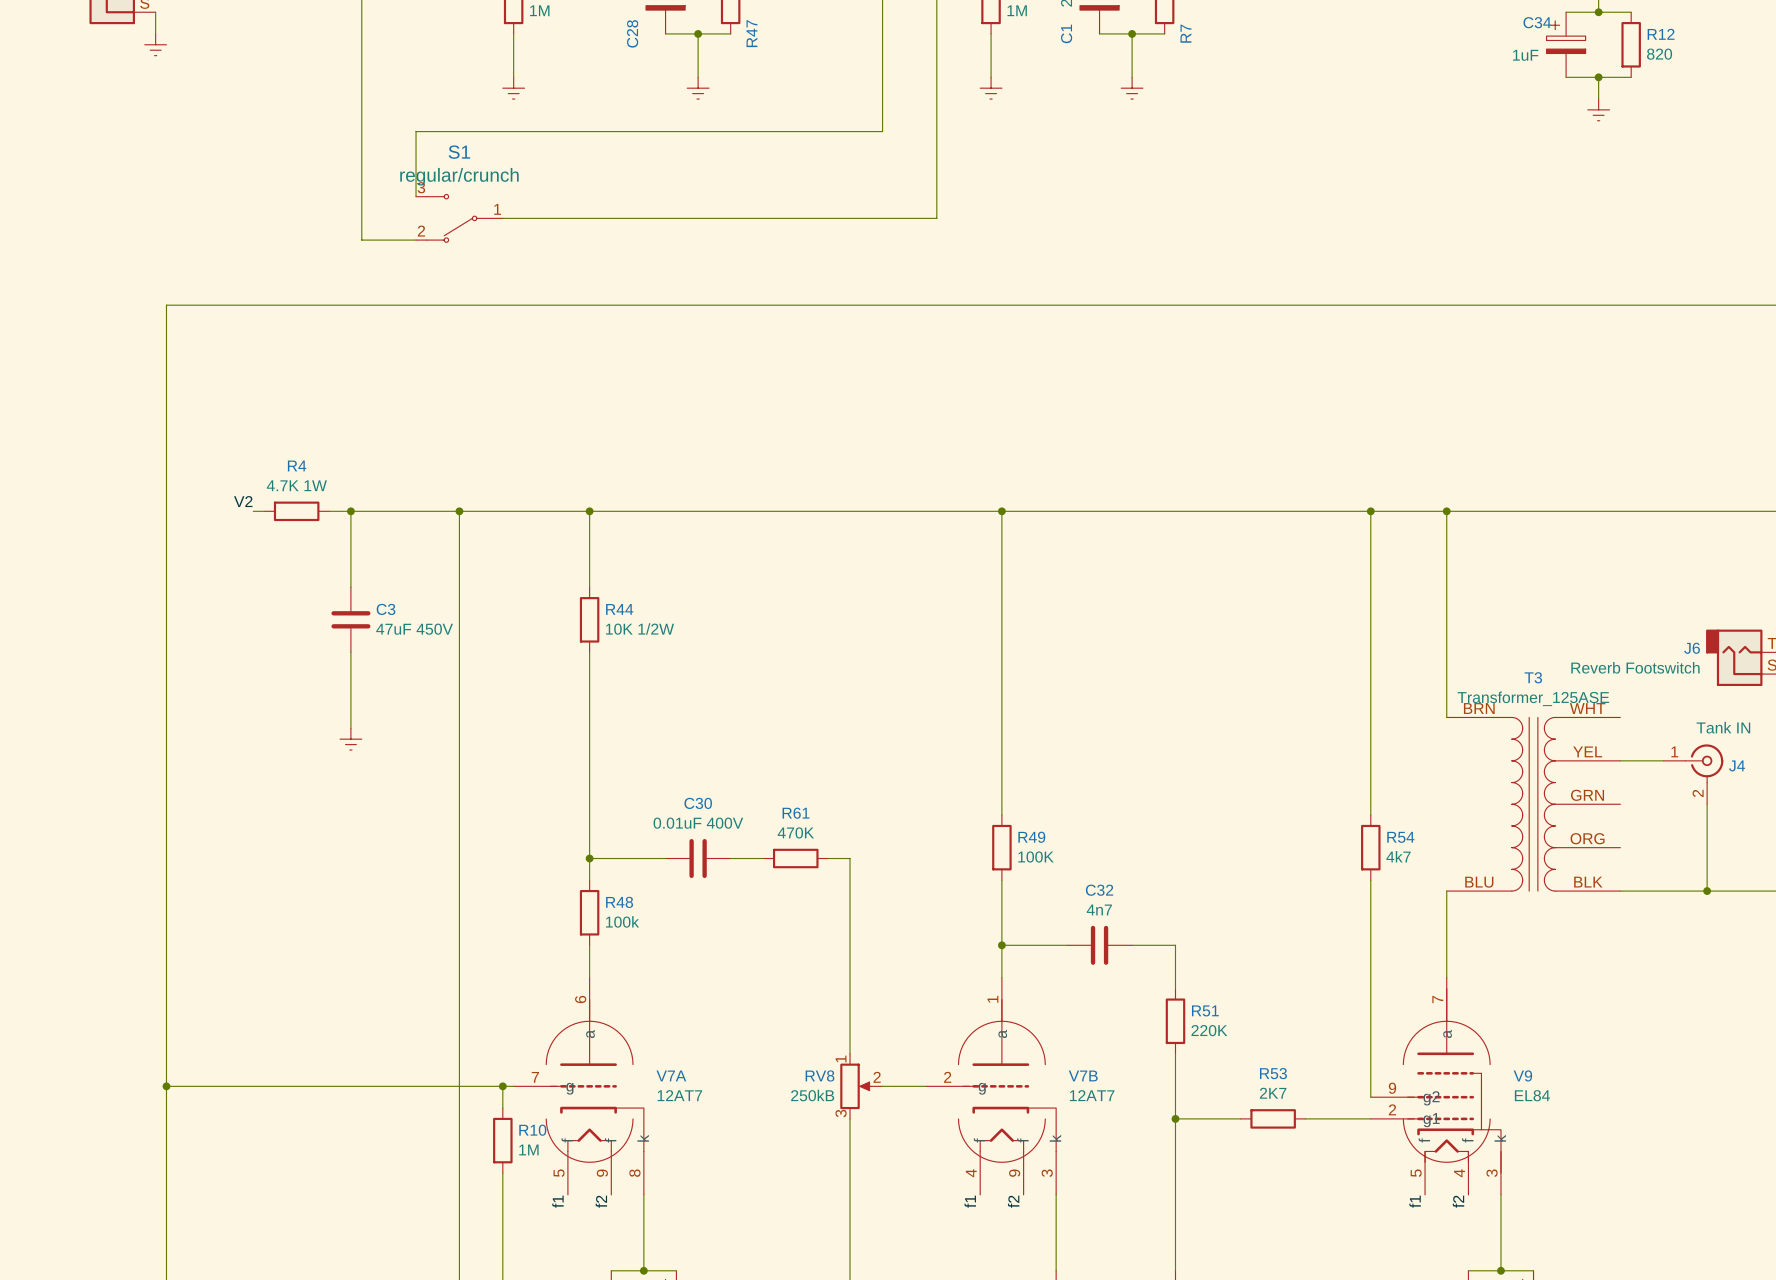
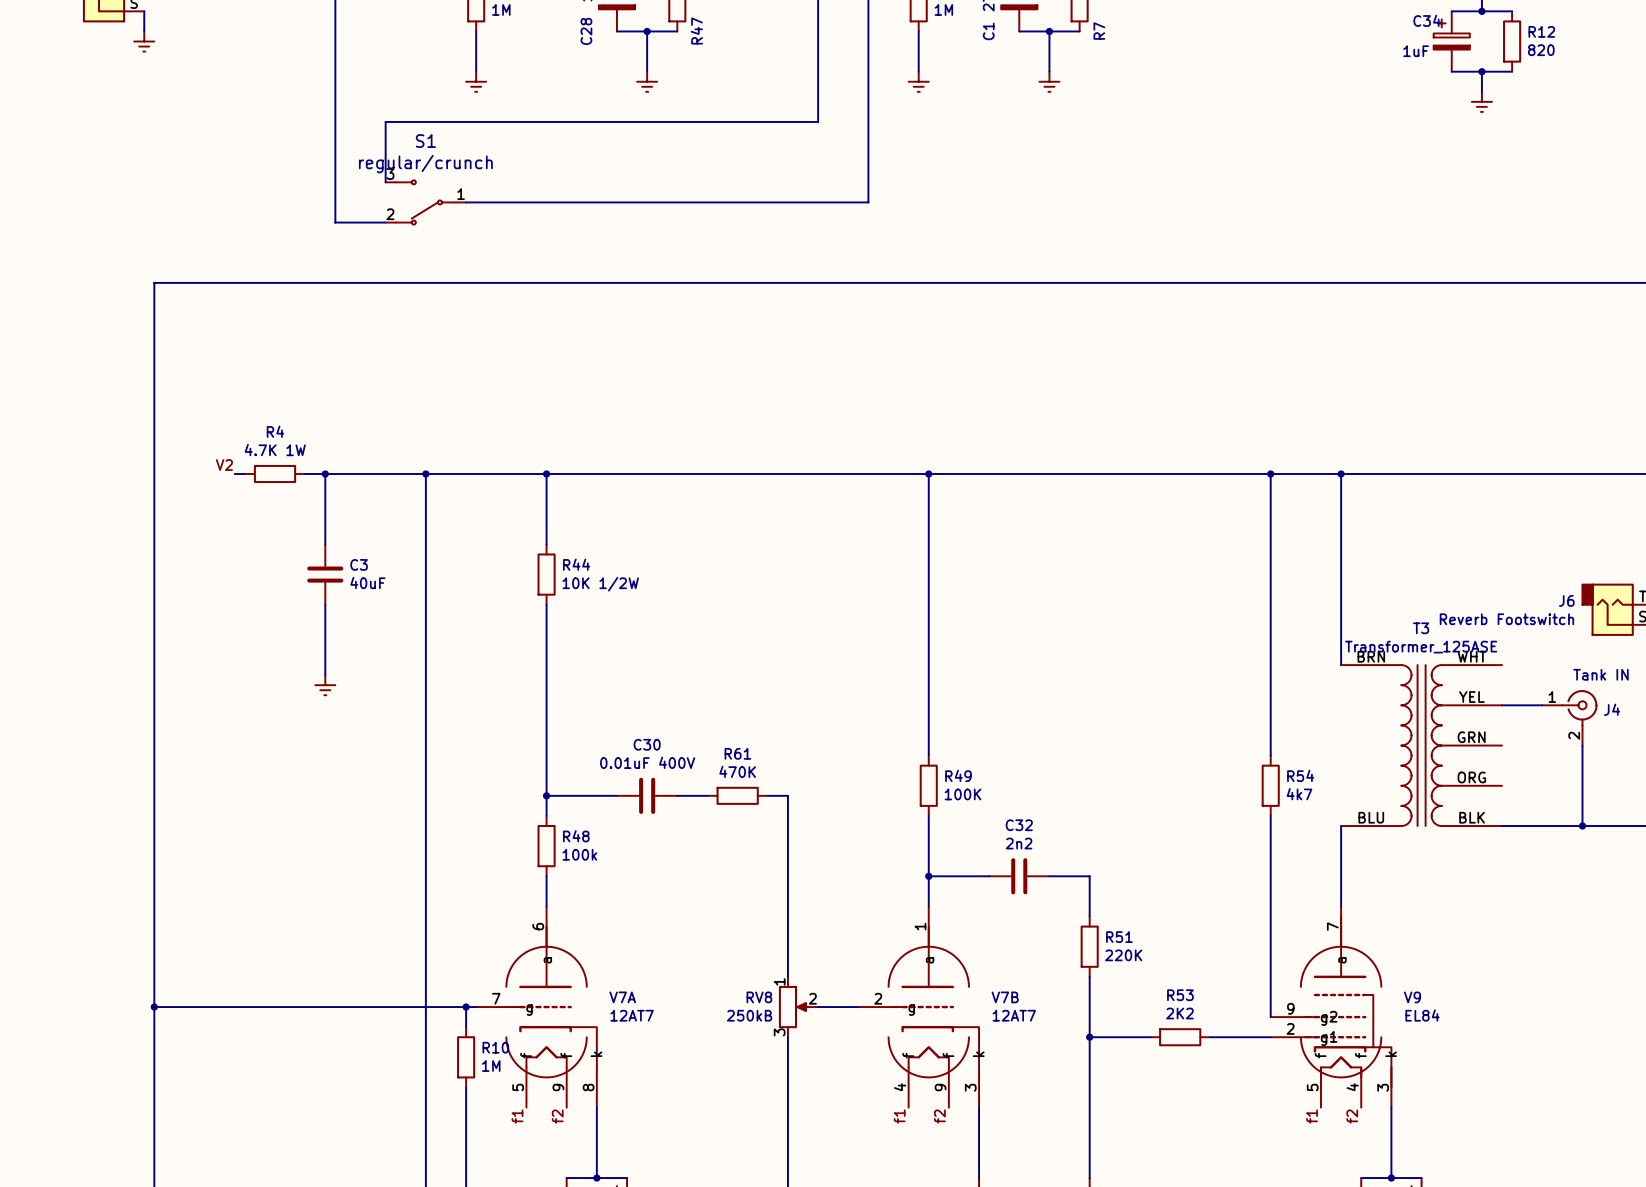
C3 value: 47uF 450V (414, 629) -> 40uF (367, 583)
C32 value: 4n7 (1099, 909) -> 2n2 (1019, 843)
R53 value: 2K7 (1273, 1093) -> 2K2 (1179, 1013)

